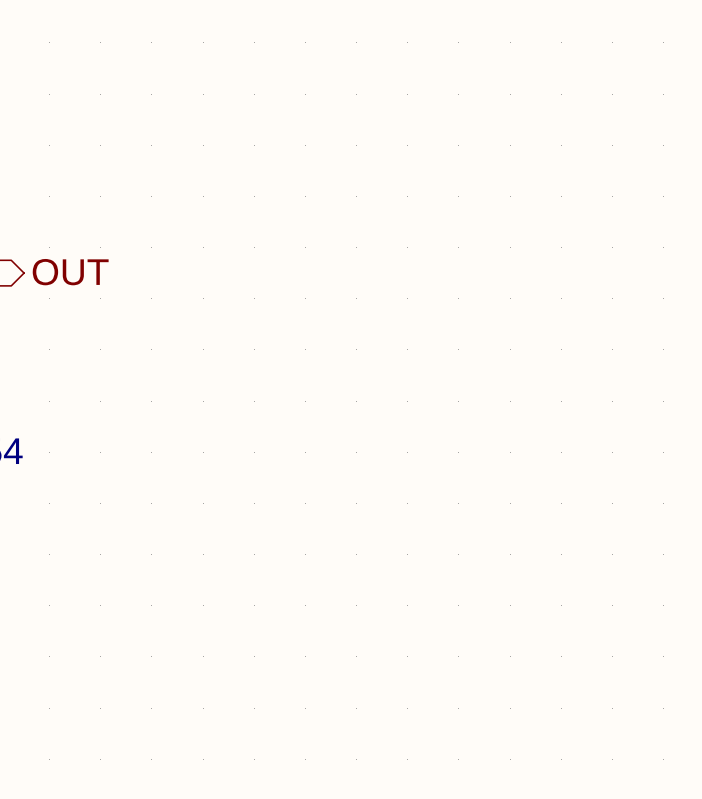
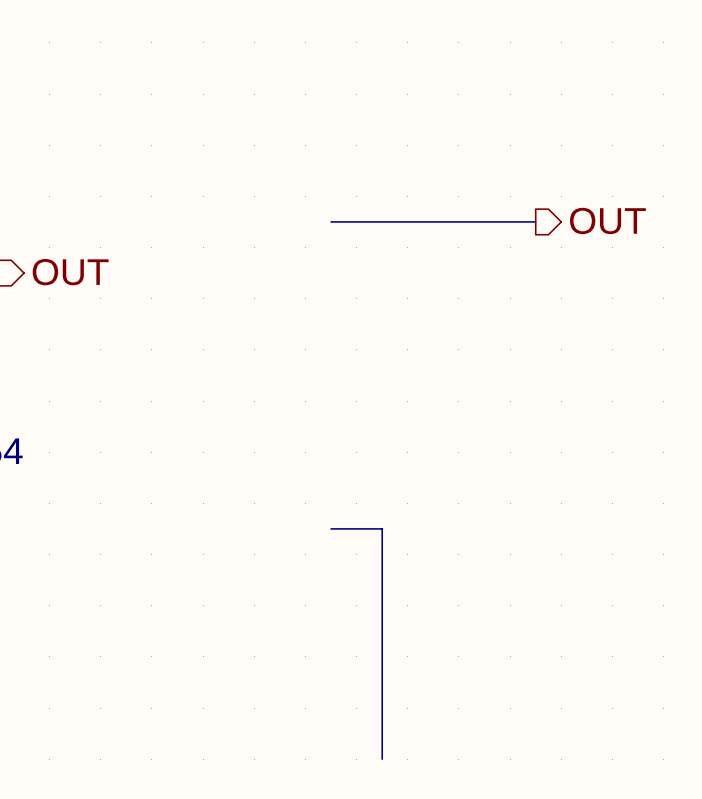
hierarchical label: none -> OUT (607, 220)
wire: none -> (331, 221) (535, 221)
wire: none -> (331, 528) (382, 528) (382, 759)

